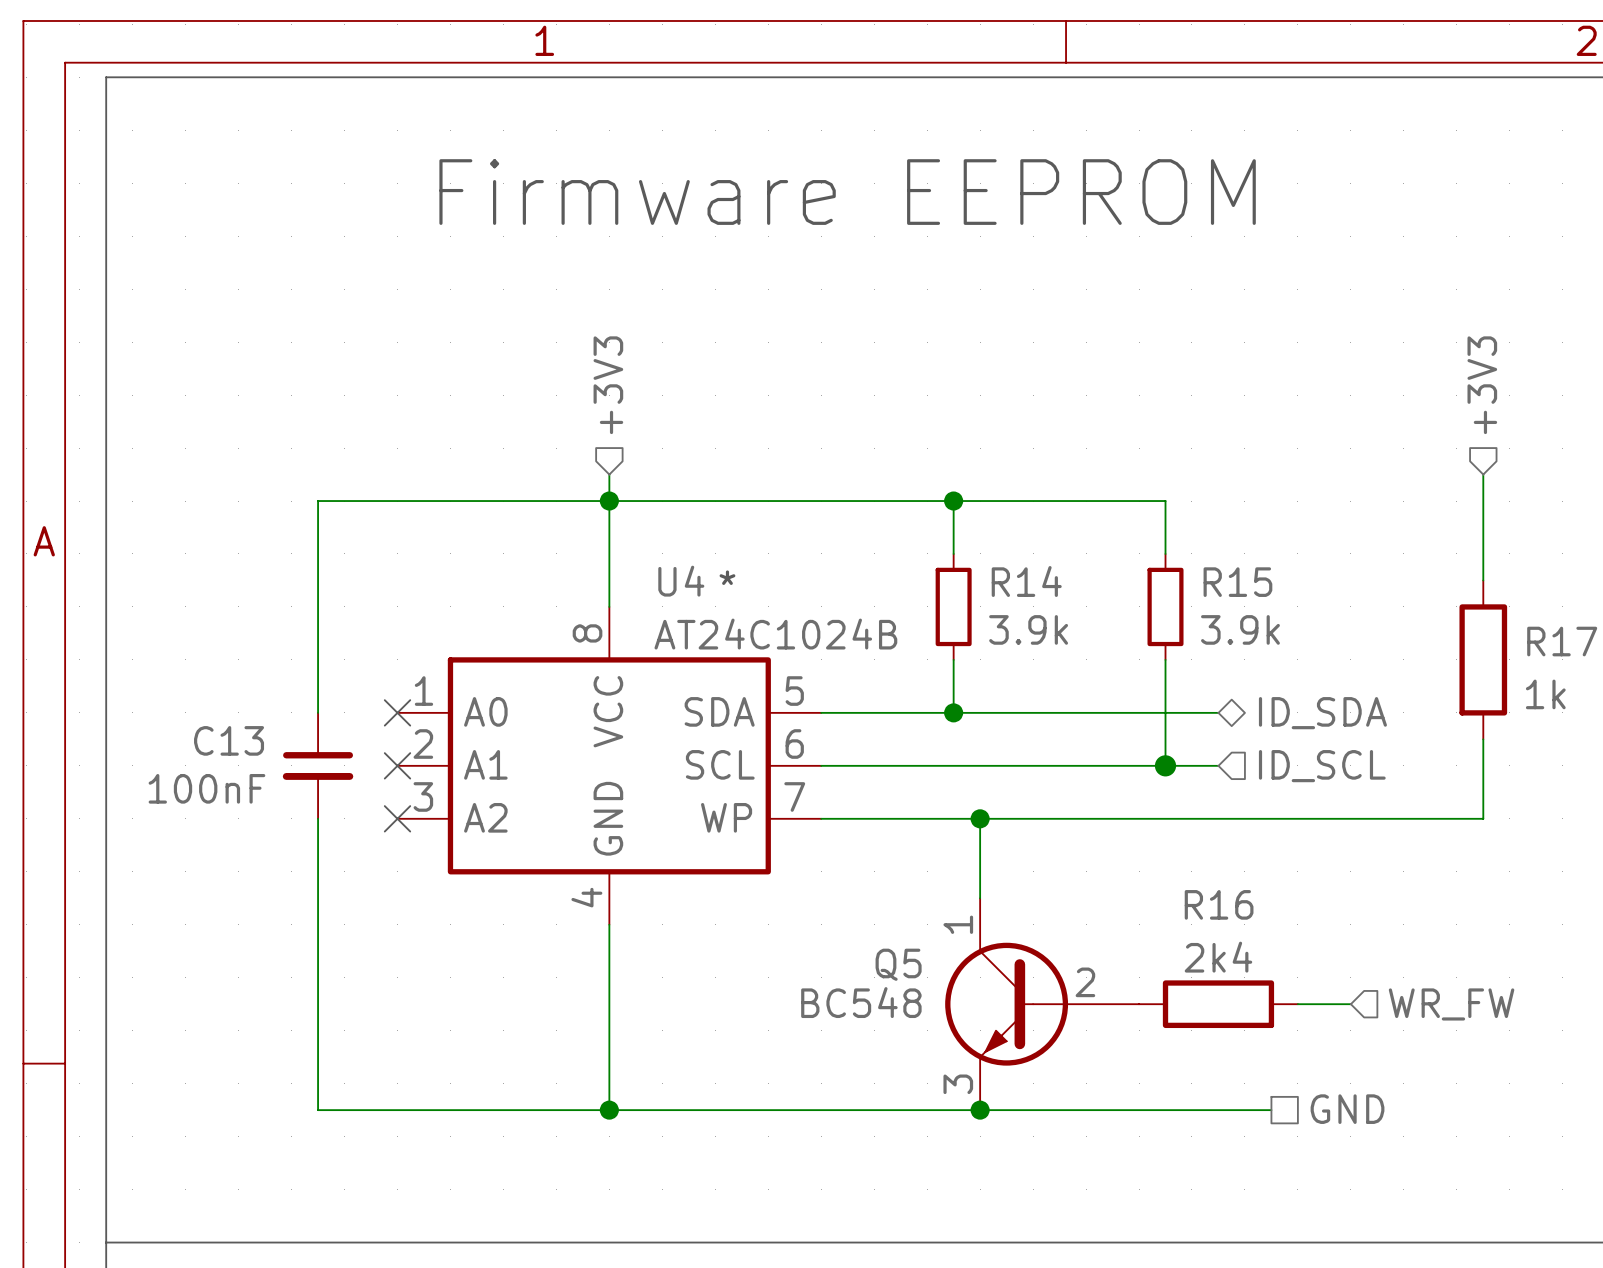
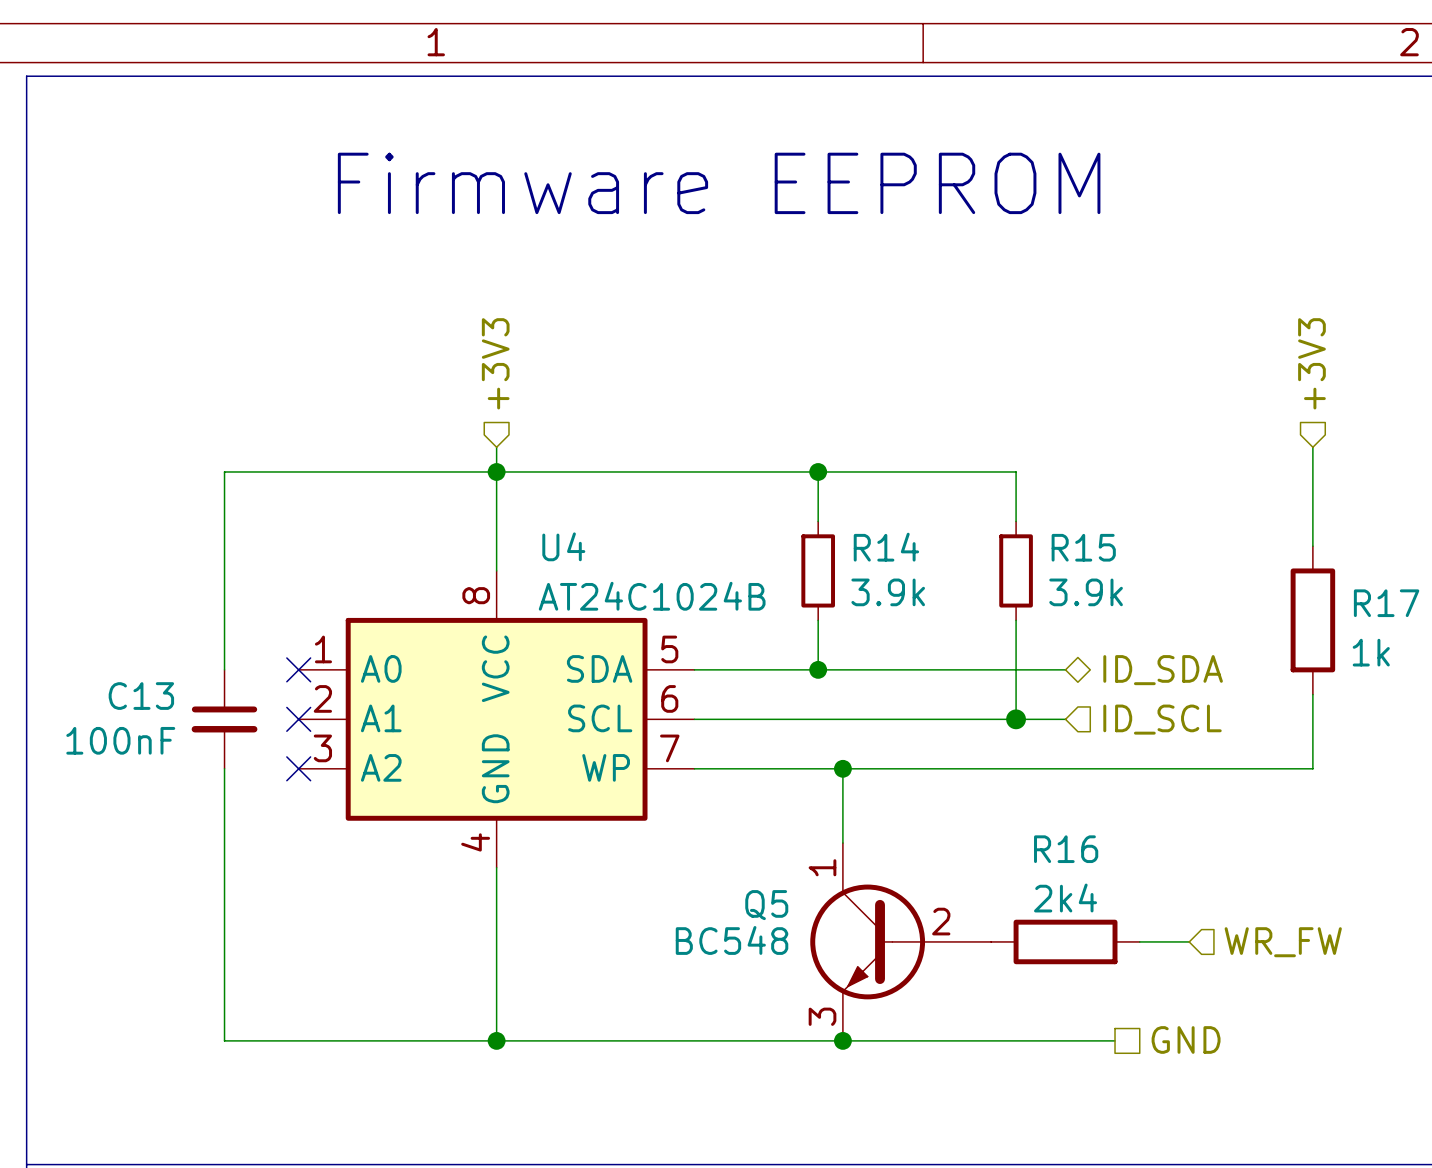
text: * (727, 577) -> none

